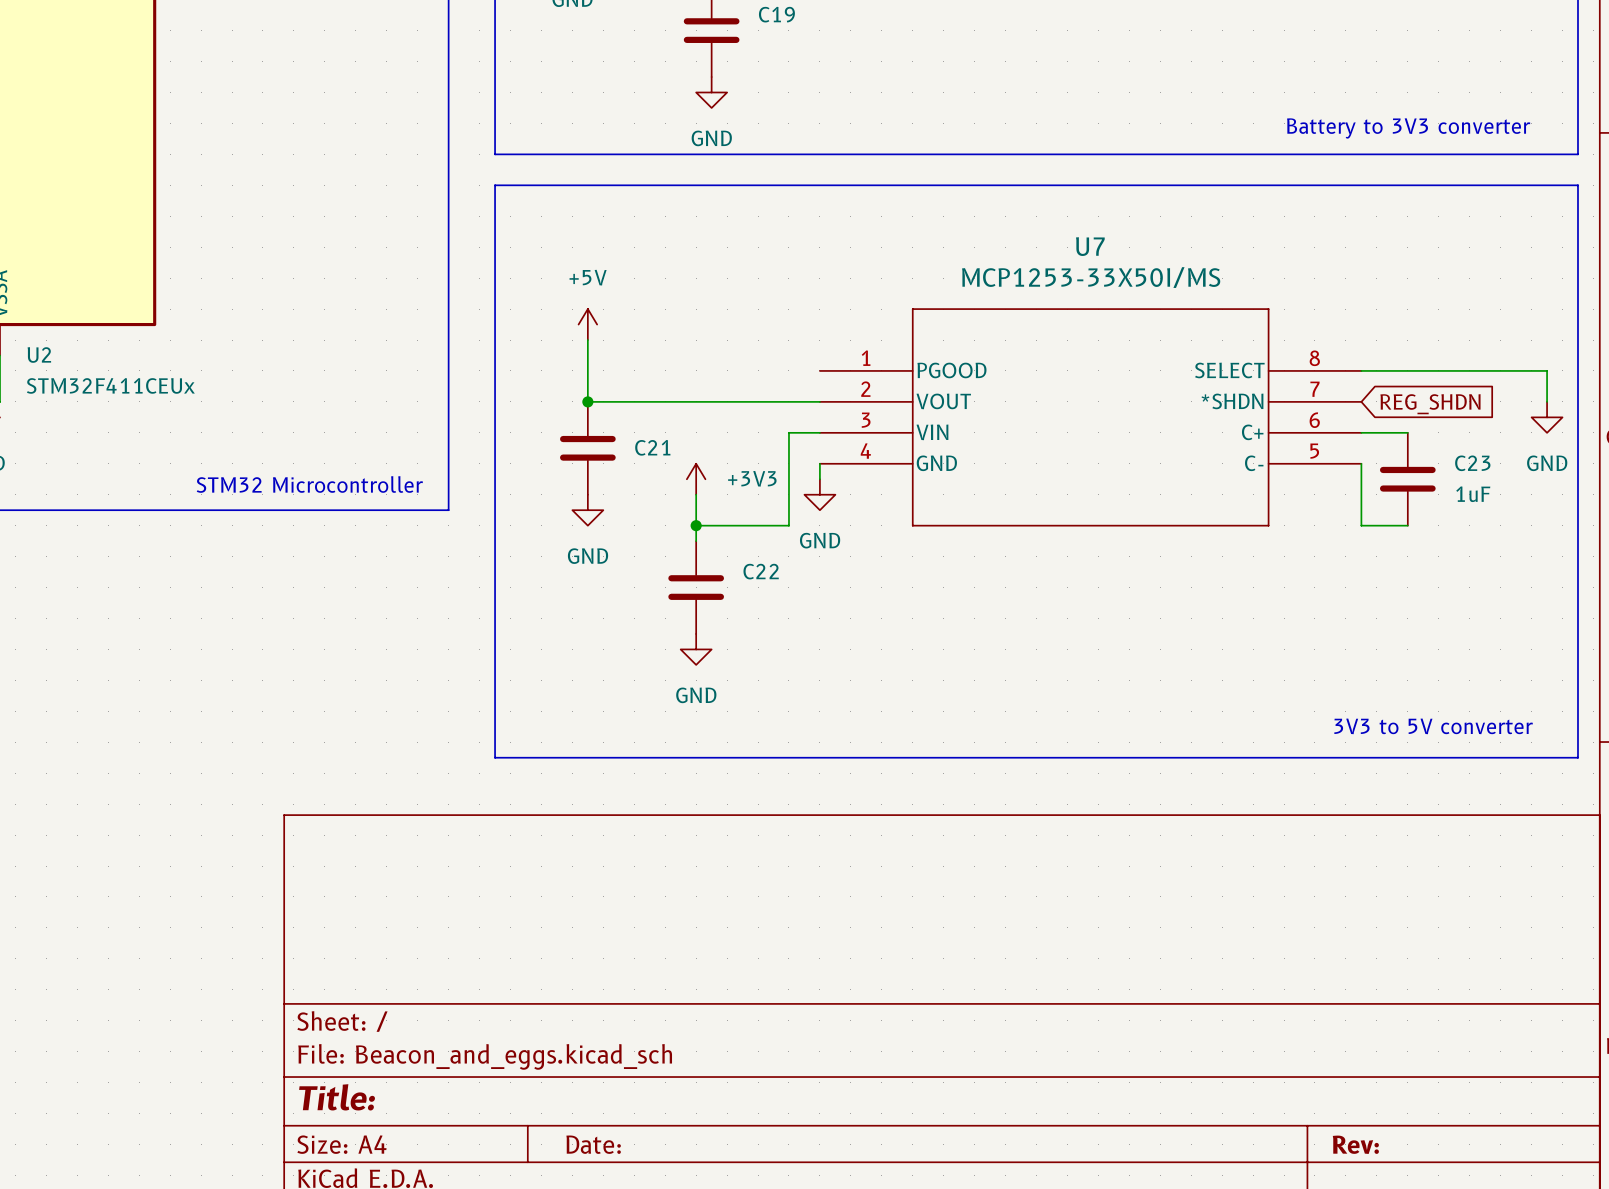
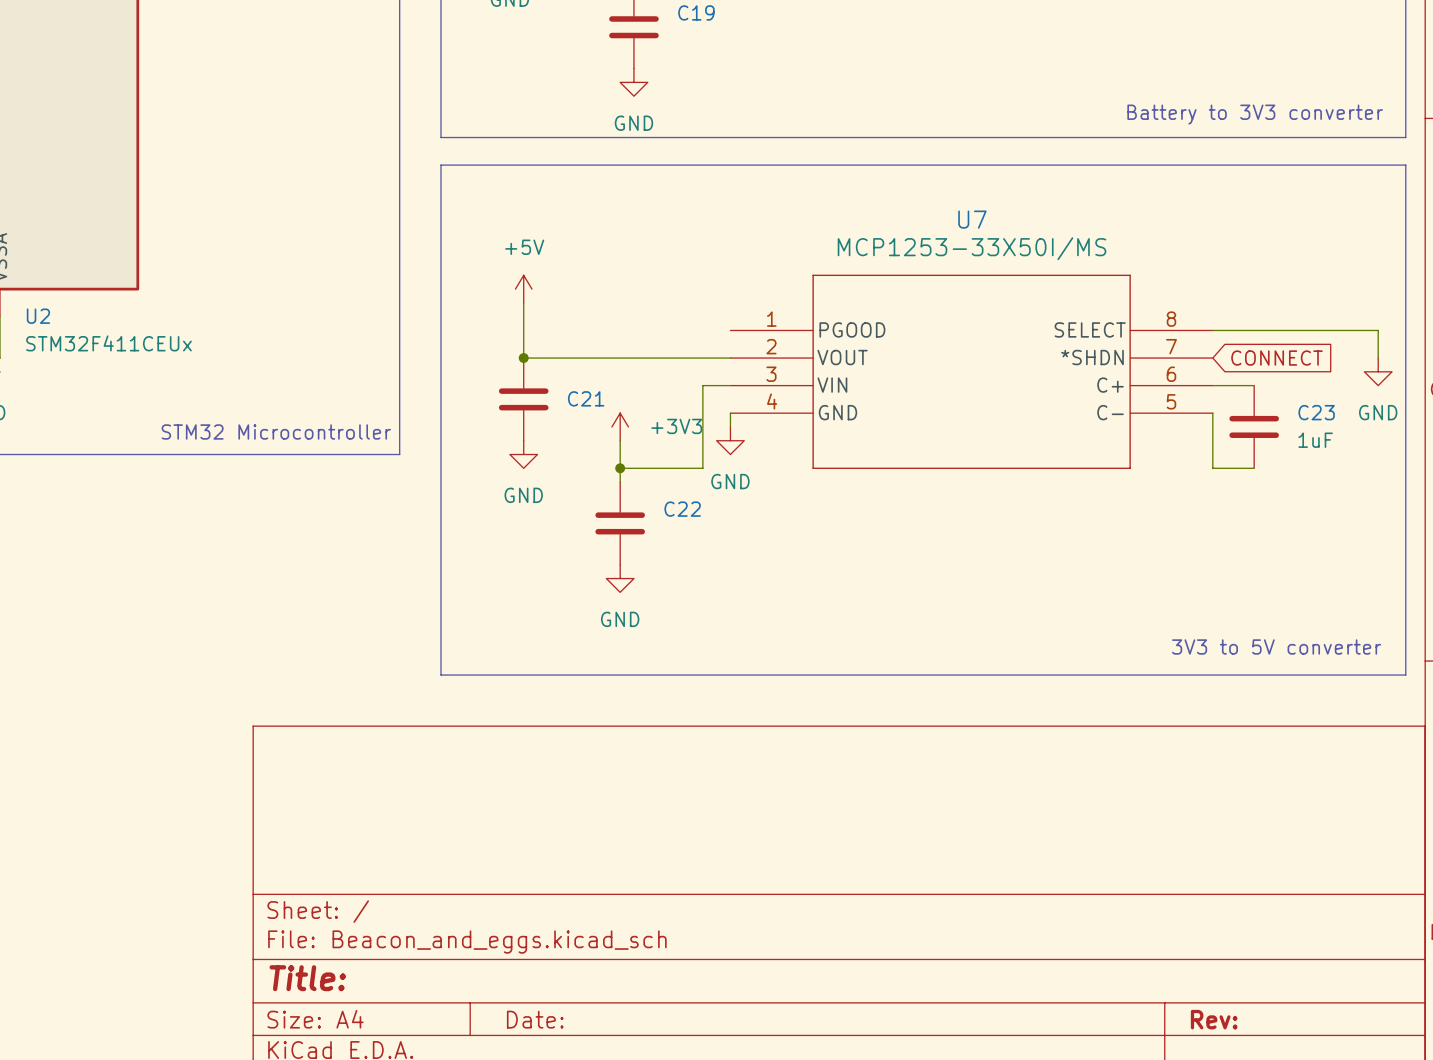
global label: REG_SHDN (1430, 404) -> CONNECT (1277, 358)

